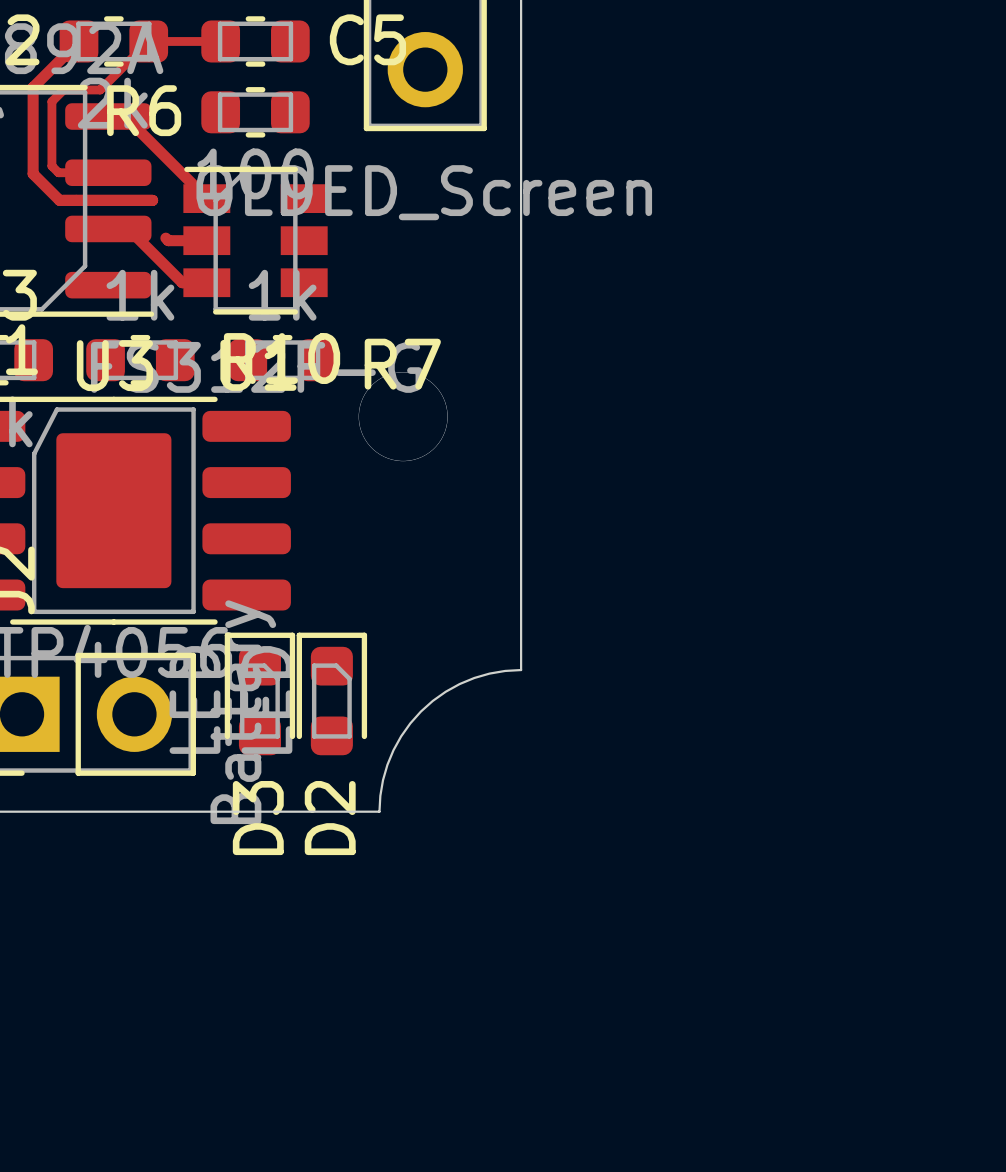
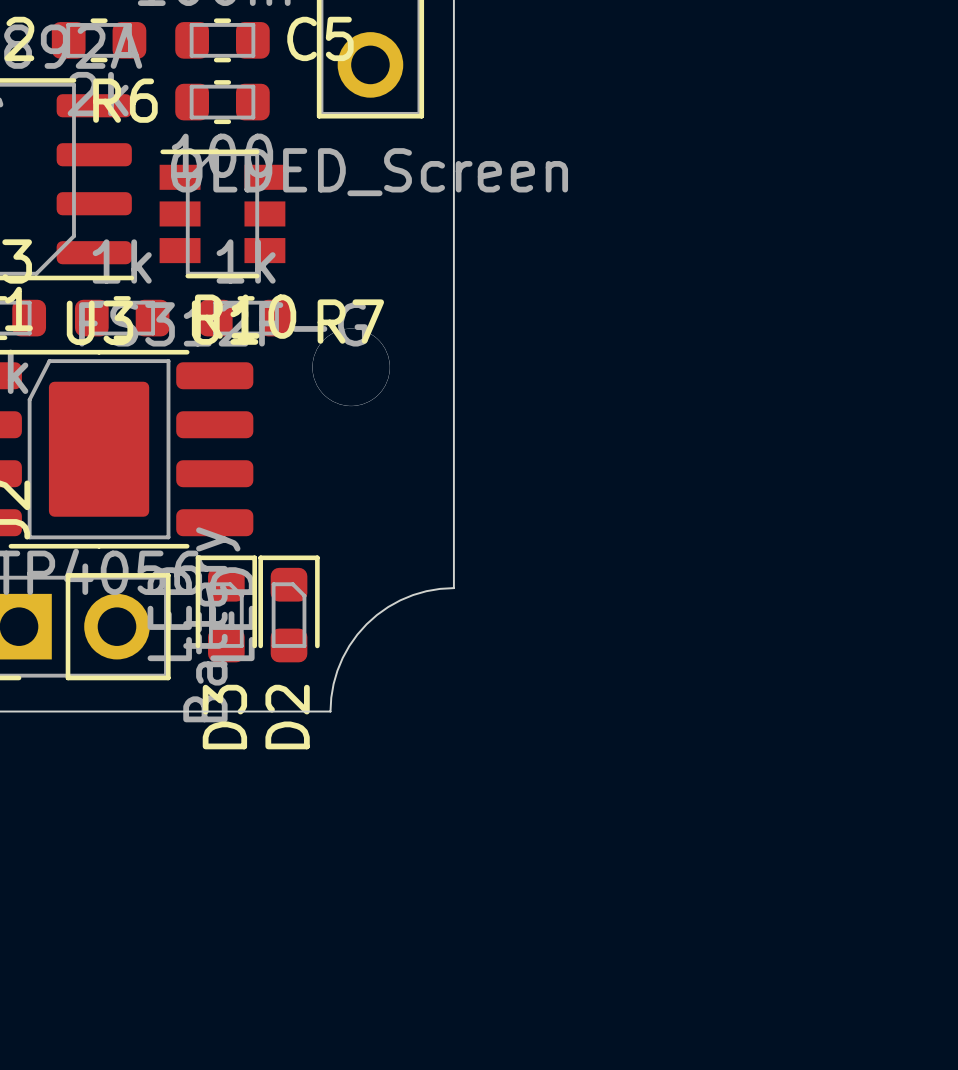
top track: (79, 41) (33, 87) (33, 173) (59, 200) (152, 200) -> none
top track: (220, 41) (148, 41) (100, 89) (63, 89) (51, 101) (51, 166) (58, 172) (108, 172) -> none
top track: (108, 116) (124, 116) (206, 198) -> none
top track: (108, 228) (128, 228) (182, 282) (206, 282) -> none
top track: (165, 238) (168, 240) (206, 240) -> none

